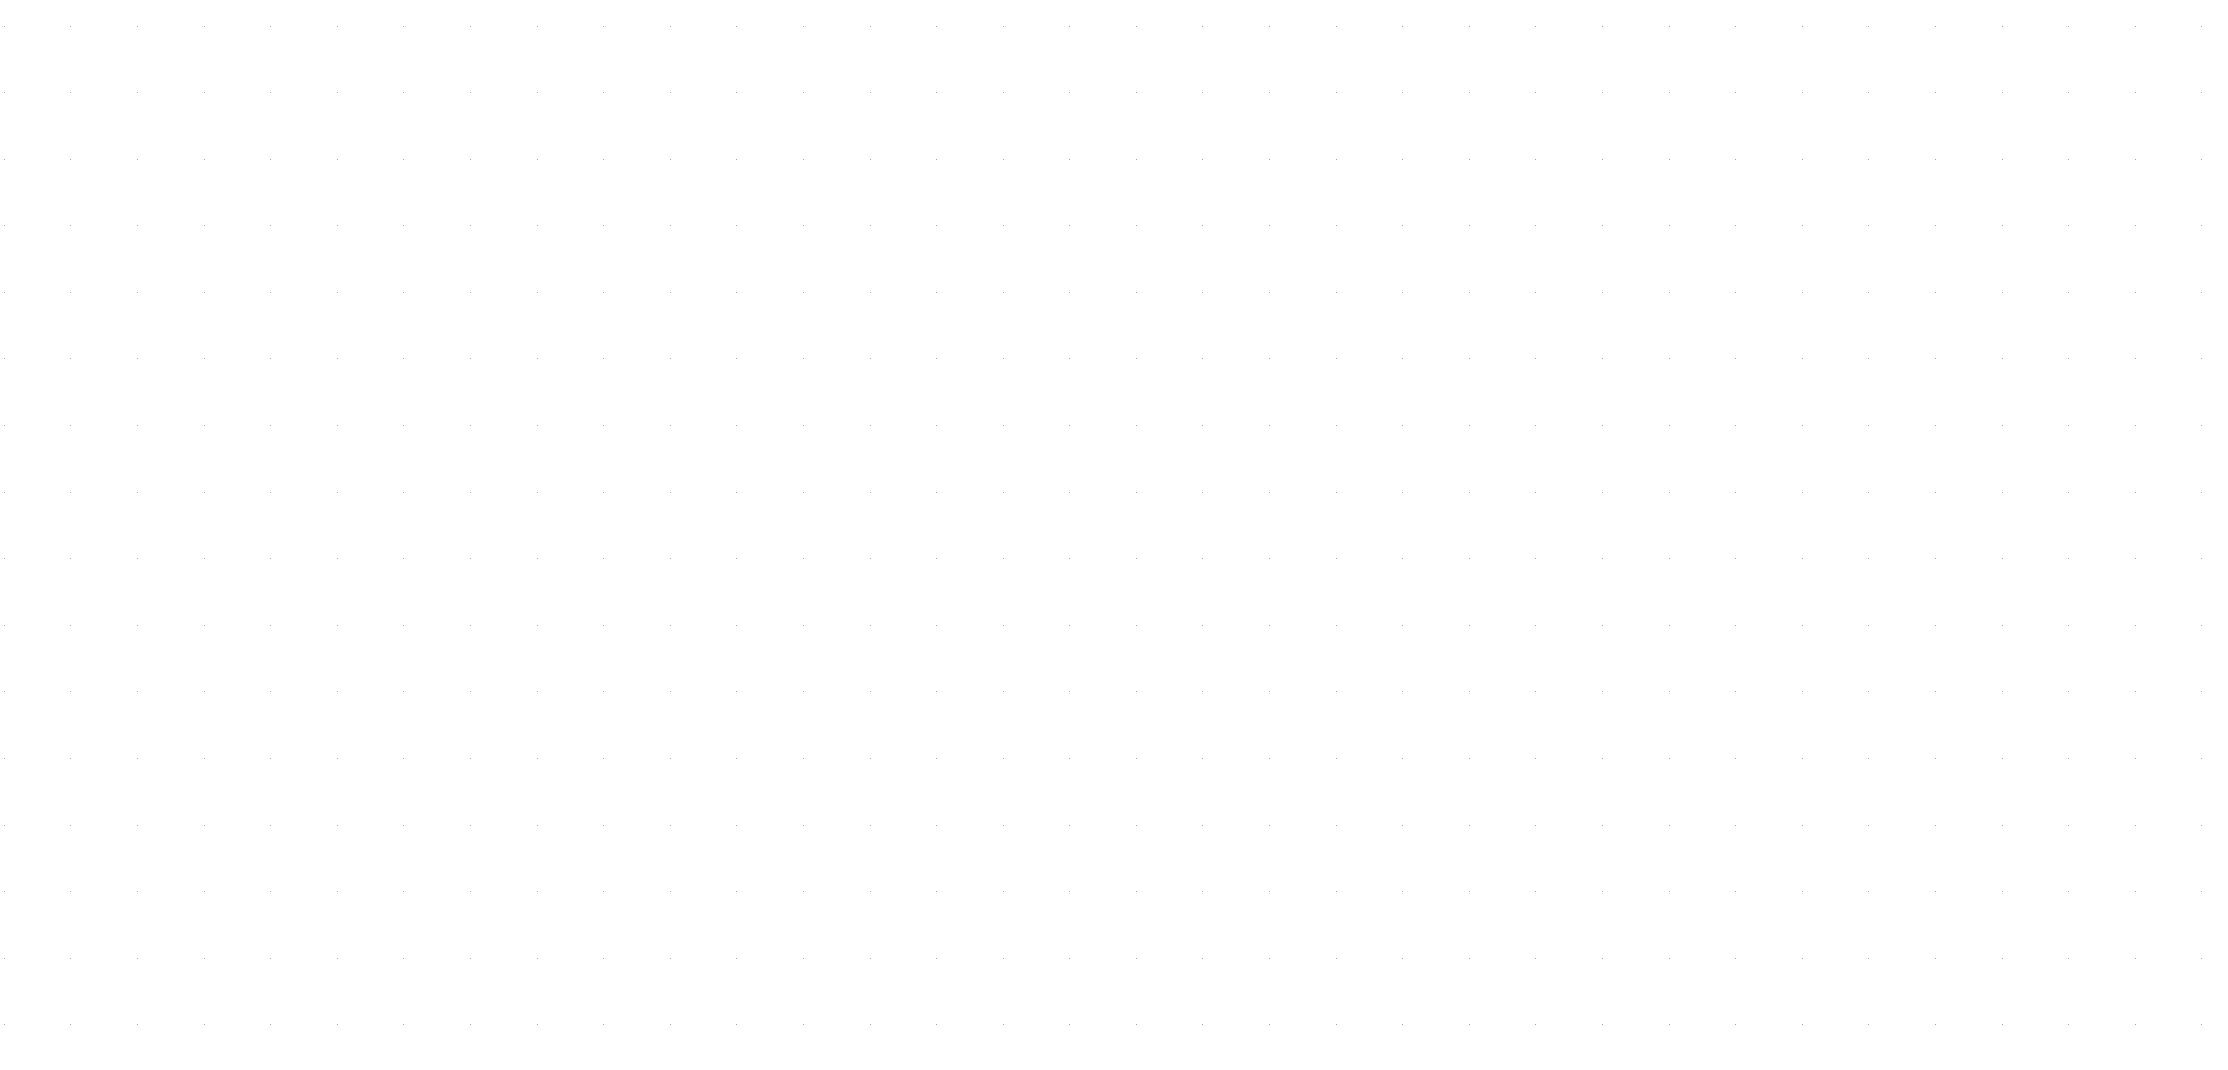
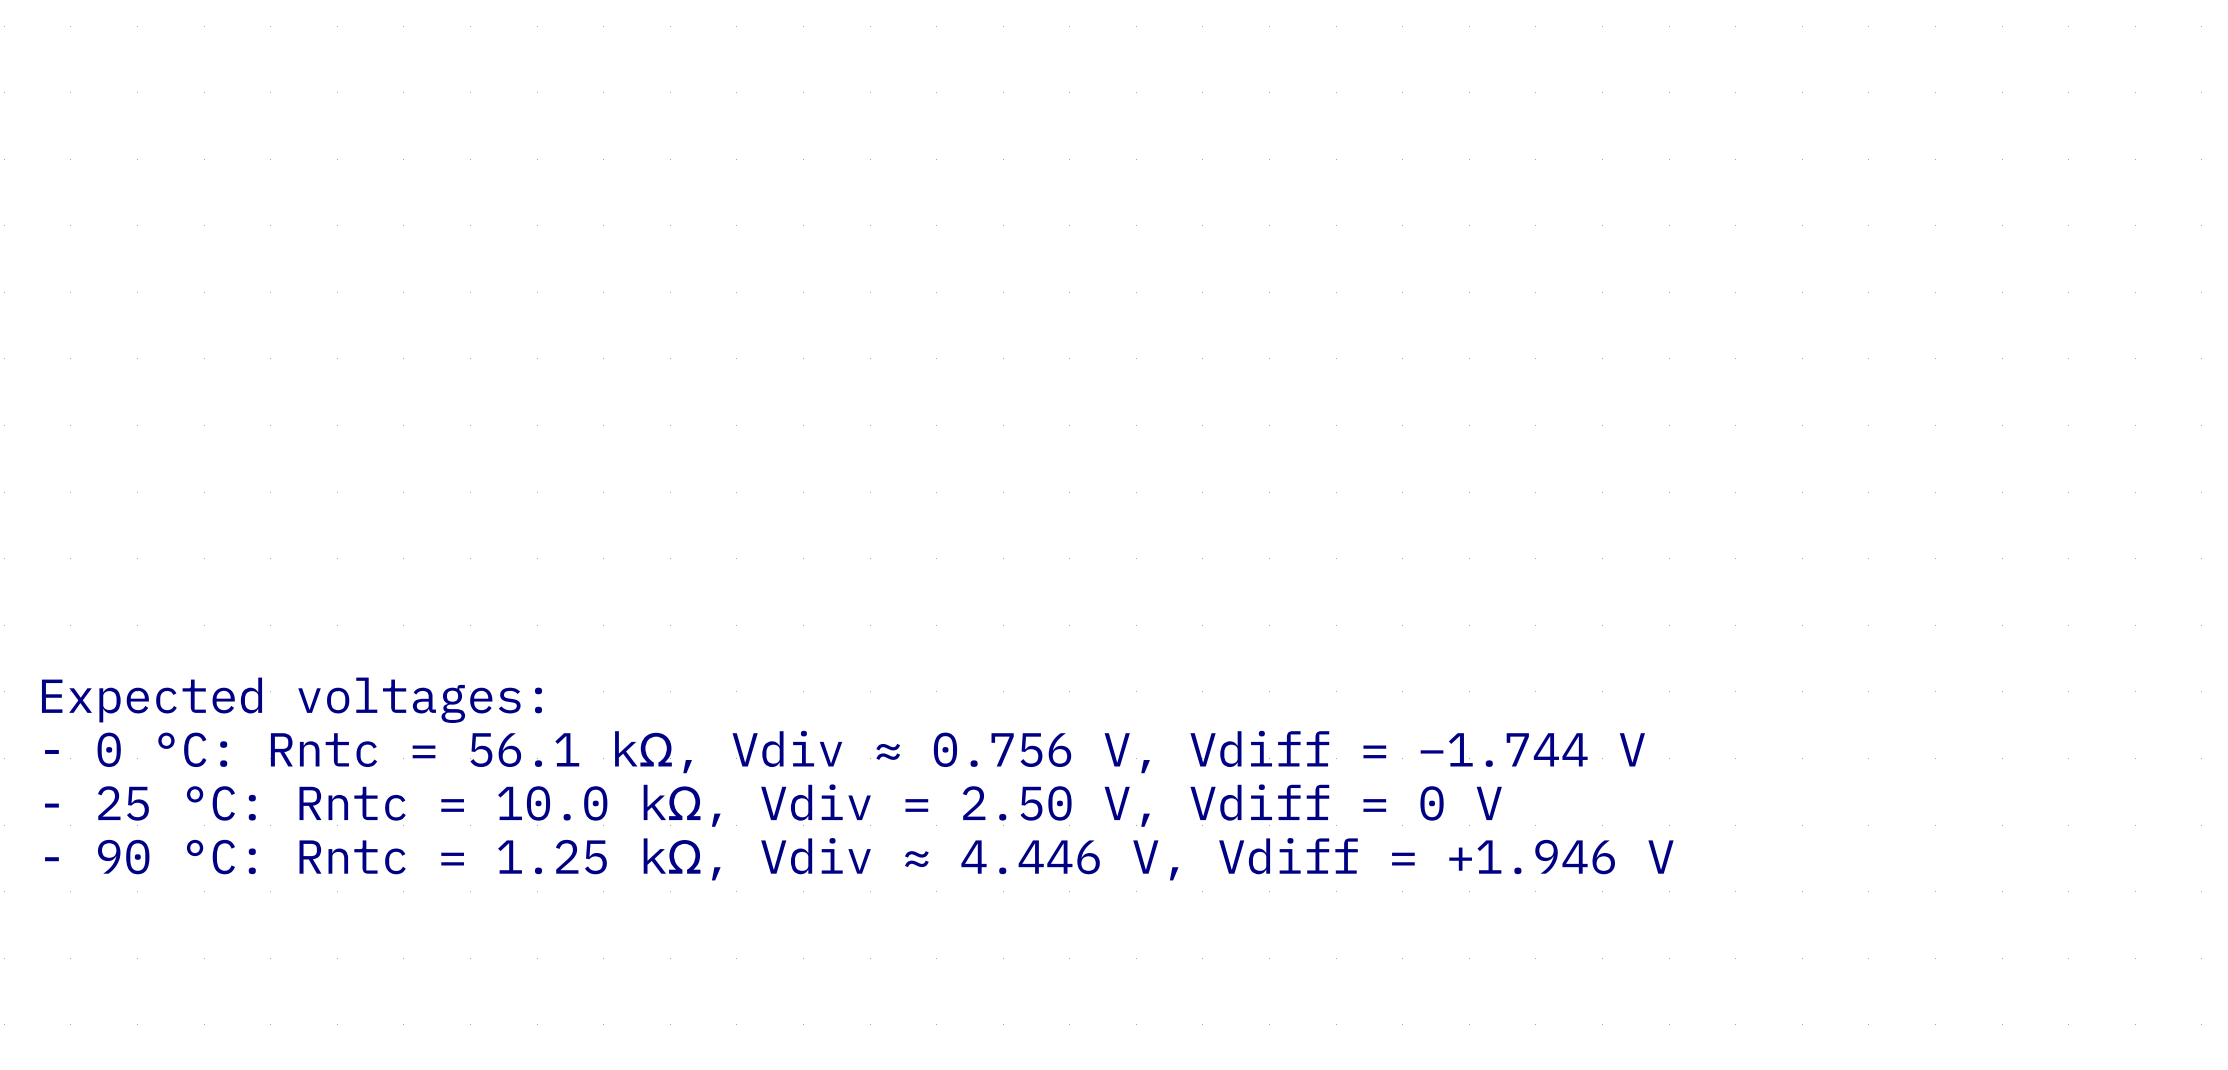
text: none -> Expected voltages: (291, 700)
text: none -> - 0 °C: Rntc = 56.1 kΩ, Vdiv ≈ 0.756 V, Vdiff = −1.744 V (845, 752)
text: none -> - 25 °C: Rntc = 10.0 kΩ, Vdiv = 2.50 V, Vdiff = 0 V (773, 805)
text: none -> - 90 °C: Rntc = 1.25 kΩ, Vdiv ≈ 4.446 V, Vdiff = +1.946 V (859, 859)

